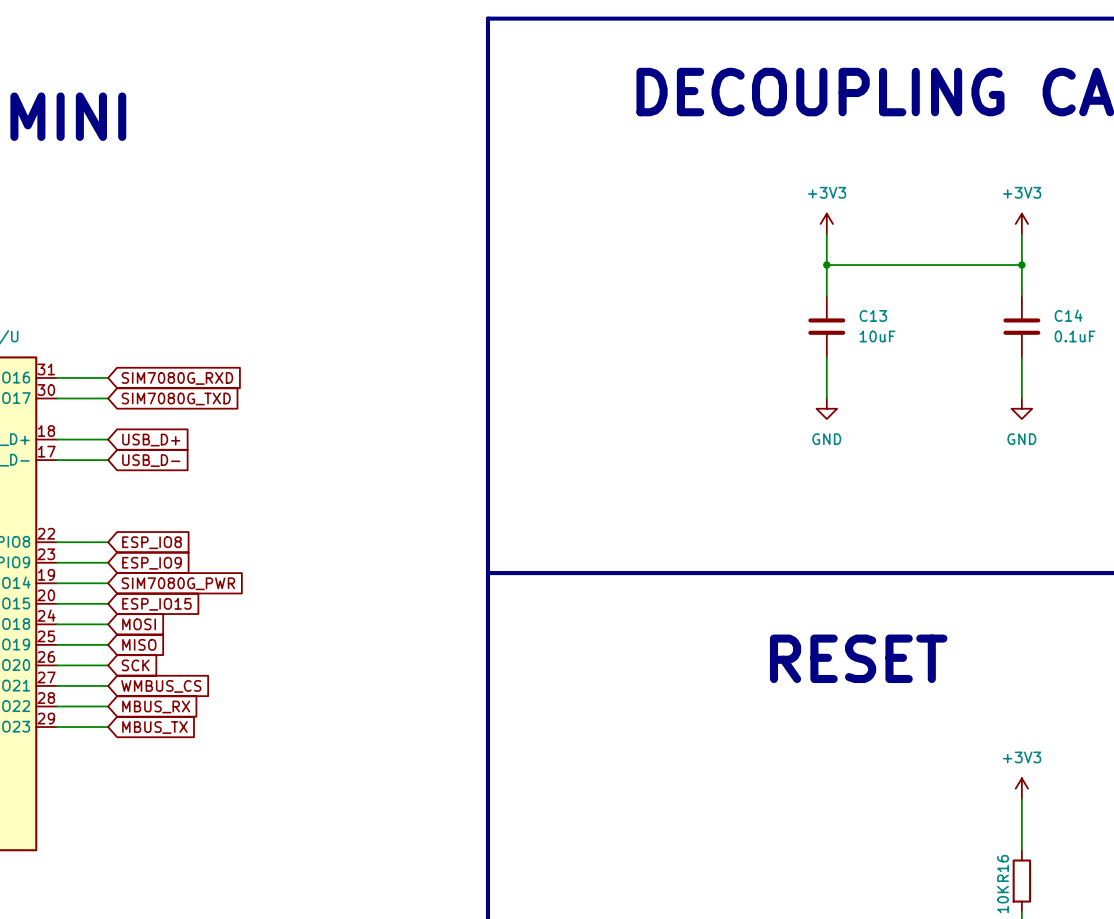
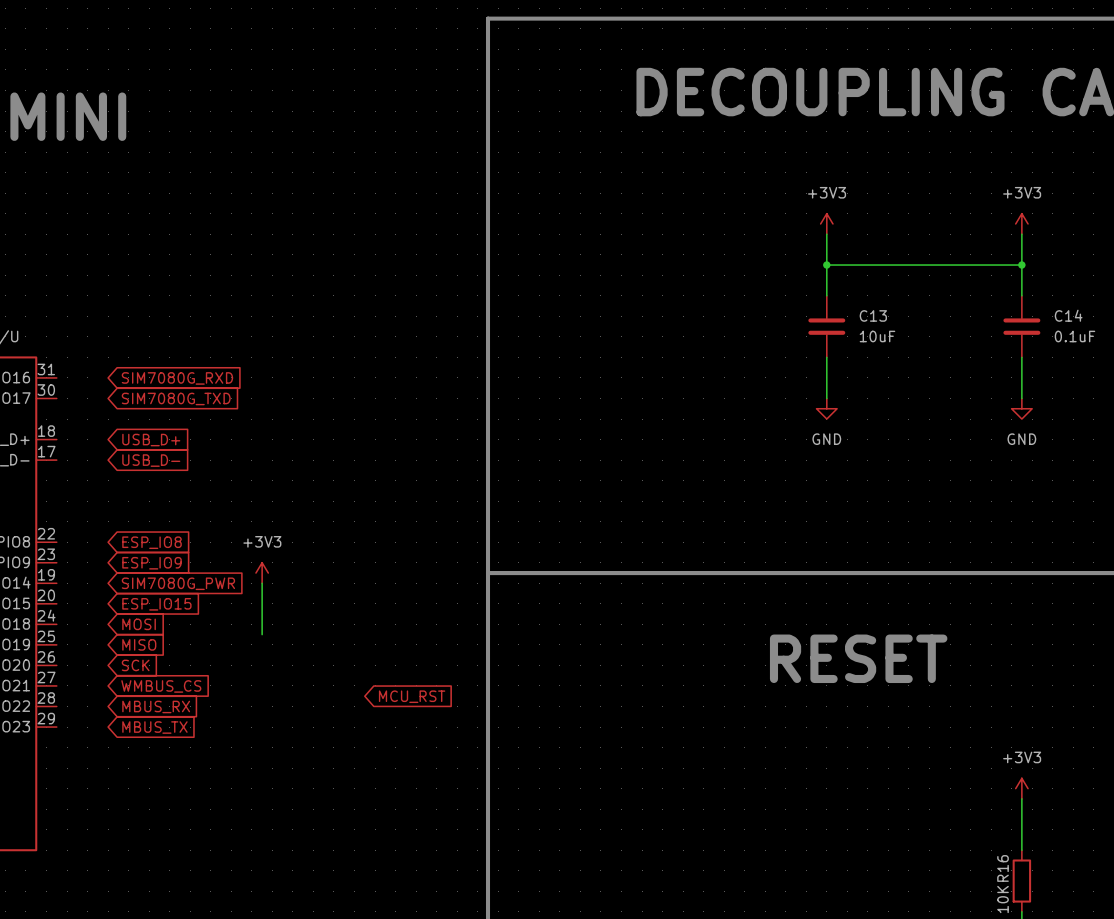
wire: (56, 377) (108, 377) -> none
wire: (56, 398) (108, 398) -> none
wire: (56, 439) (108, 439) -> none
wire: (56, 460) (108, 460) -> none
wire: (56, 542) (108, 542) -> none
wire: (56, 562) (108, 562) -> none
power symbol: none -> +3V3 (262, 573)
wire: (56, 583) (108, 583) -> none
wire: none -> (262, 583) (262, 634)
wire: (56, 603) (108, 603) -> none
wire: (56, 624) (108, 624) -> none
wire: (56, 644) (108, 644) -> none
wire: (56, 665) (108, 665) -> none
wire: (56, 685) (108, 685) -> none
global label: none -> MCU_RST (412, 696)
wire: (56, 706) (108, 706) -> none
wire: (56, 727) (108, 727) -> none

